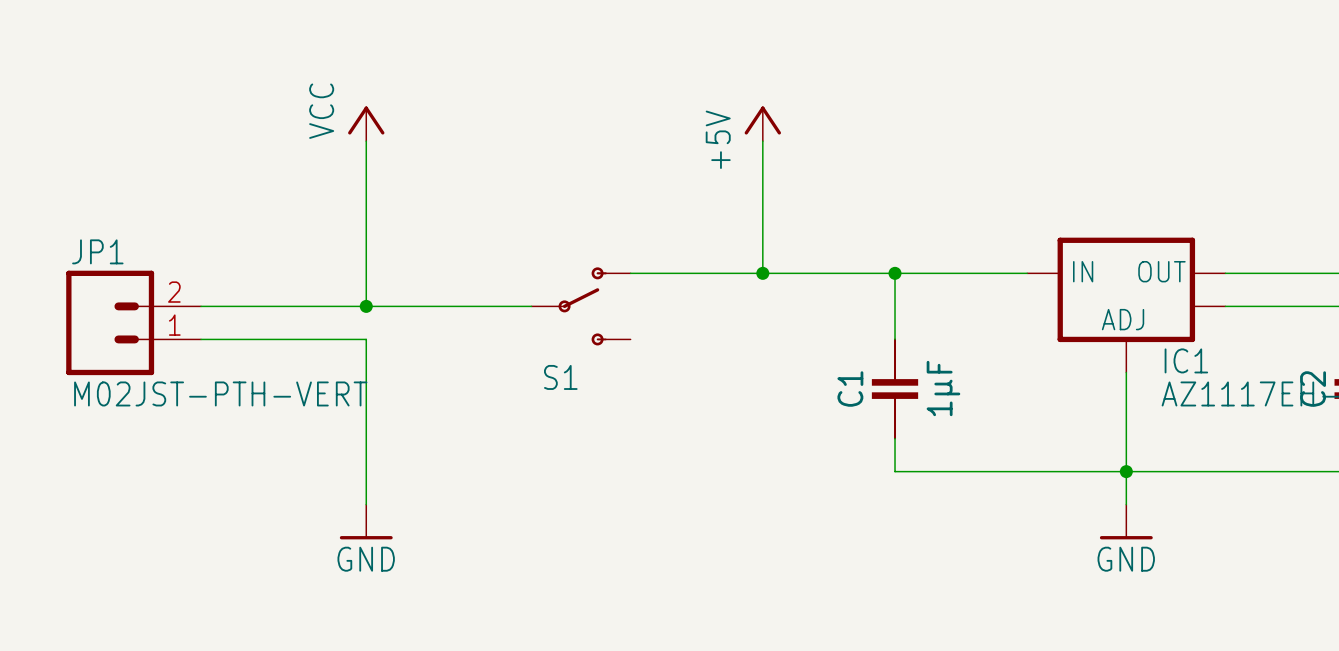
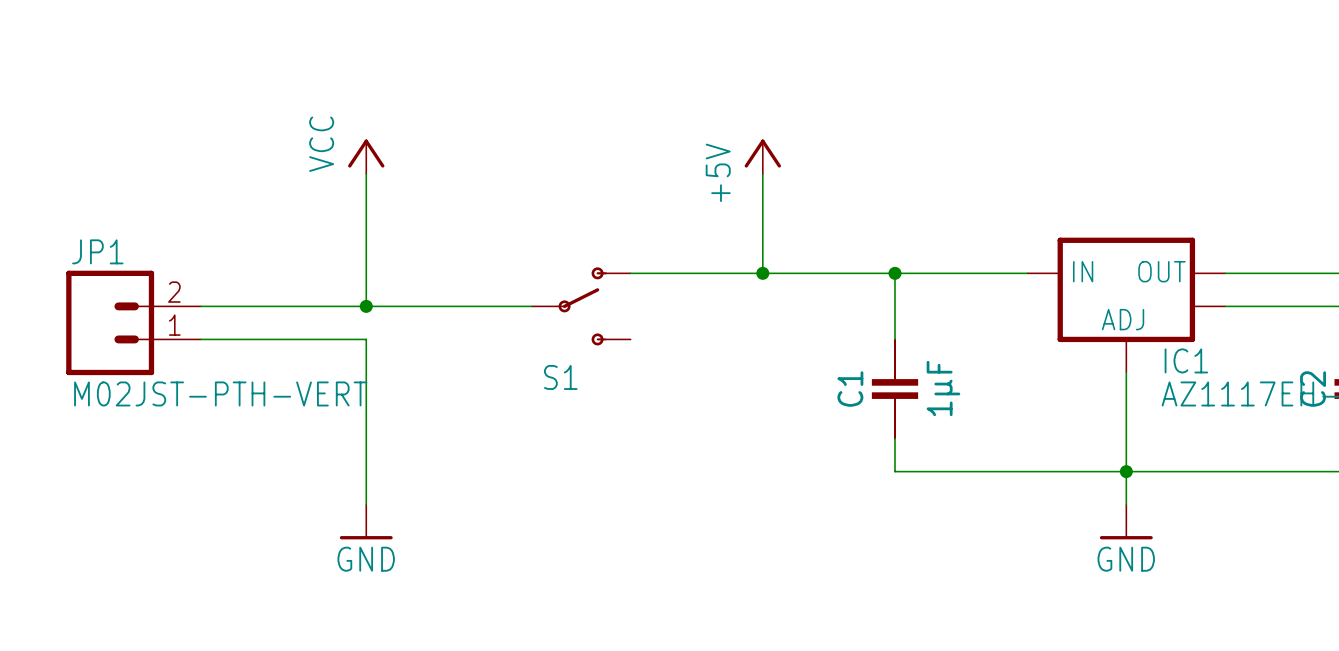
power symbol position: VCC (366, 123) -> VCC (366, 156)
power symbol position: +5V (762, 123) -> +5V (762, 156)

